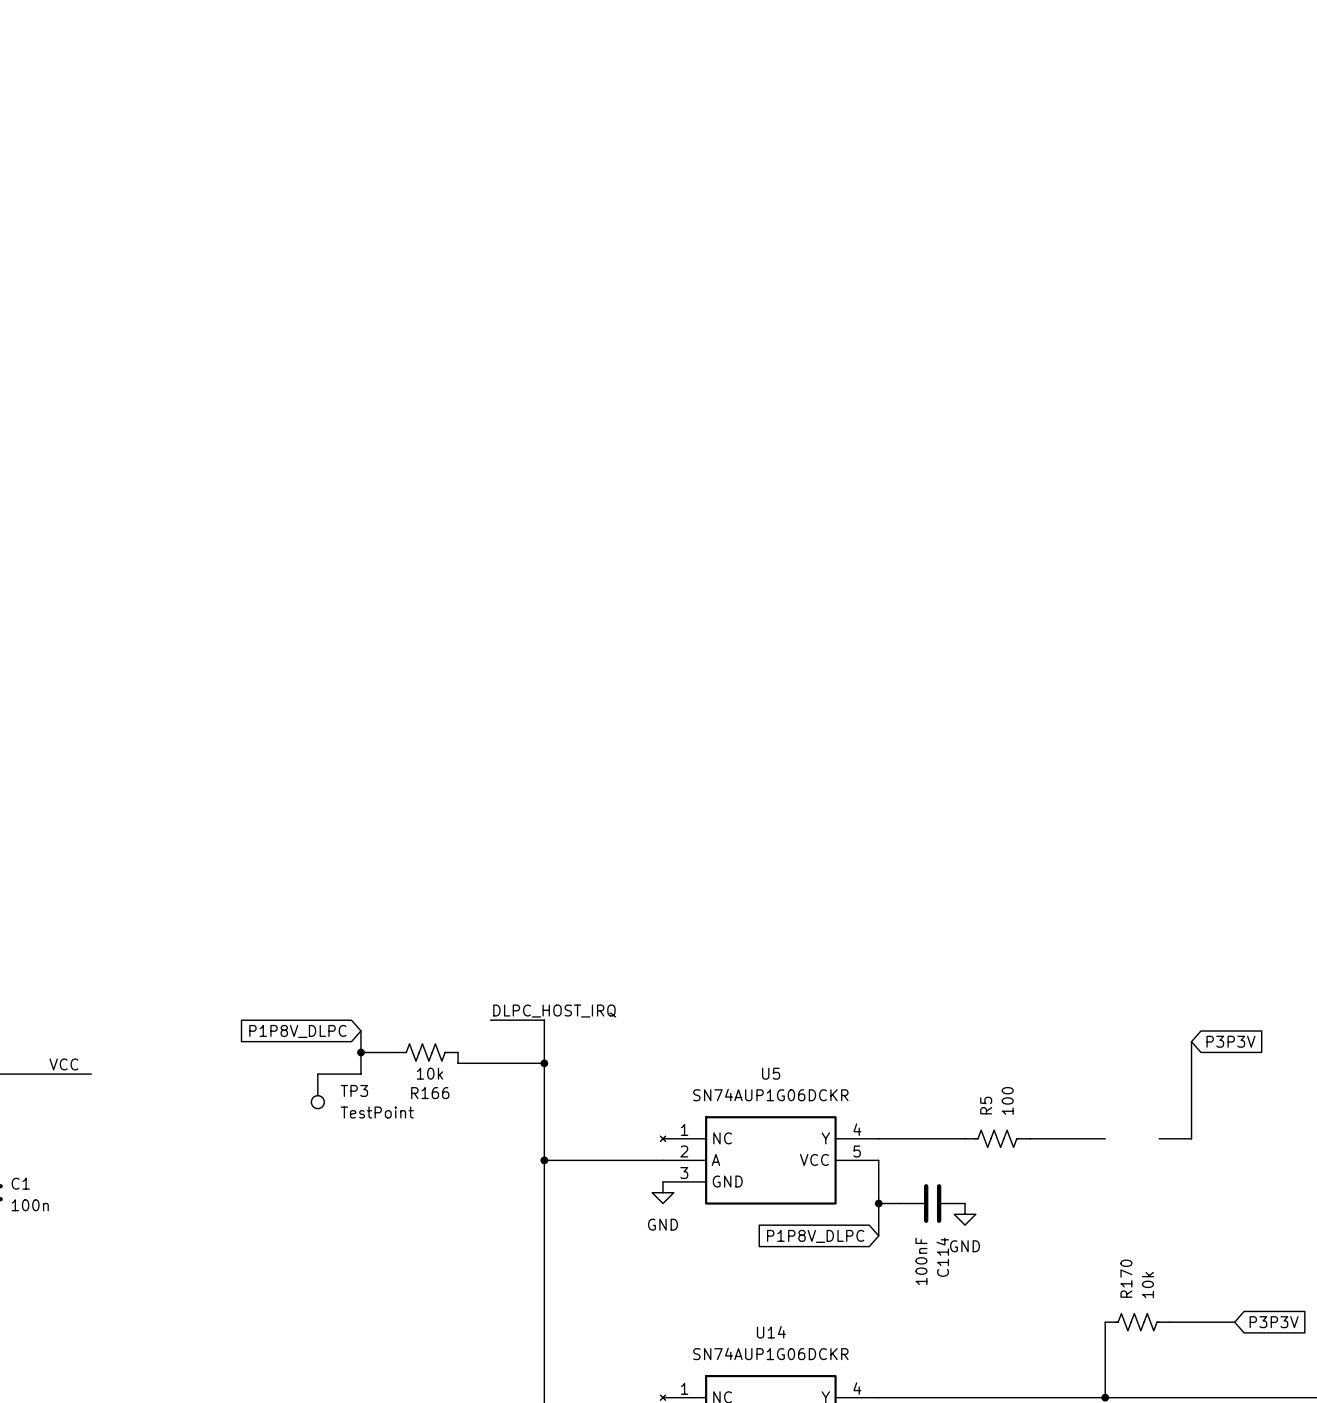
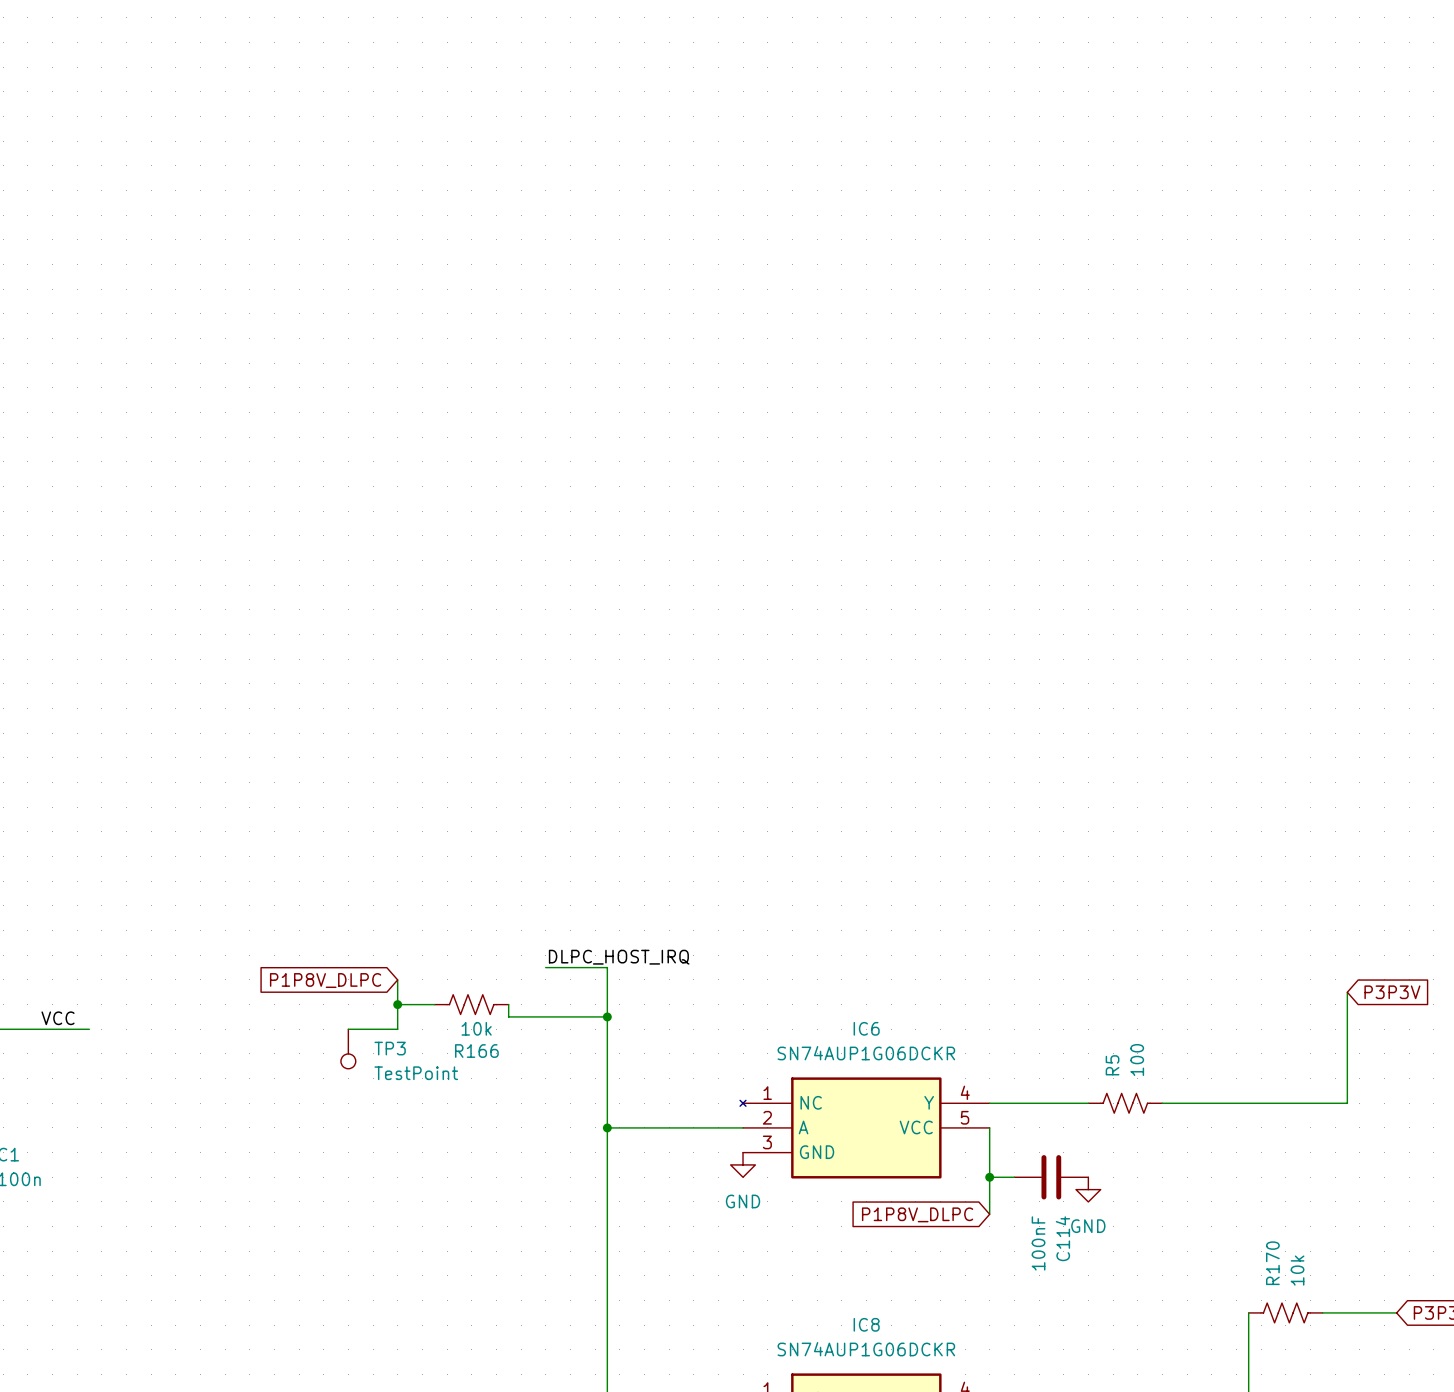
U5 name: U5 (771, 1073) -> IC6 (866, 1028)
wire: none -> (1248, 1103) (1310, 1103)
U14 name: U14 (771, 1332) -> IC8 (866, 1324)

